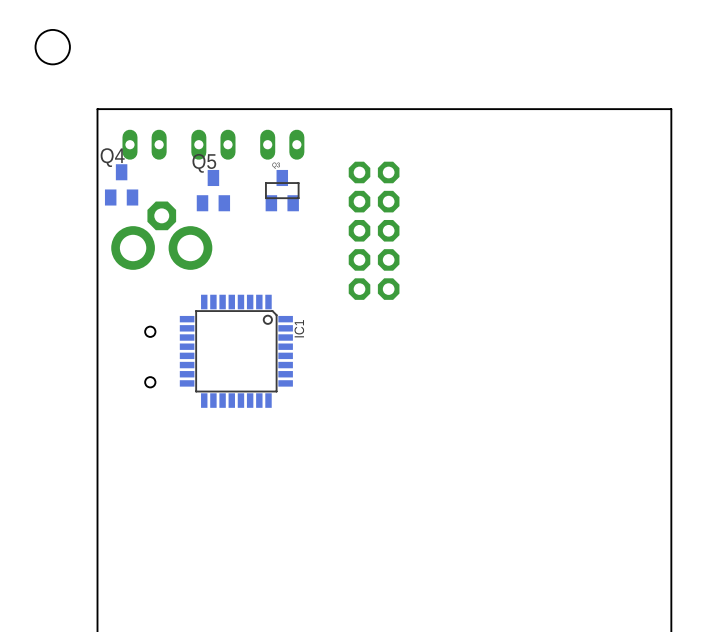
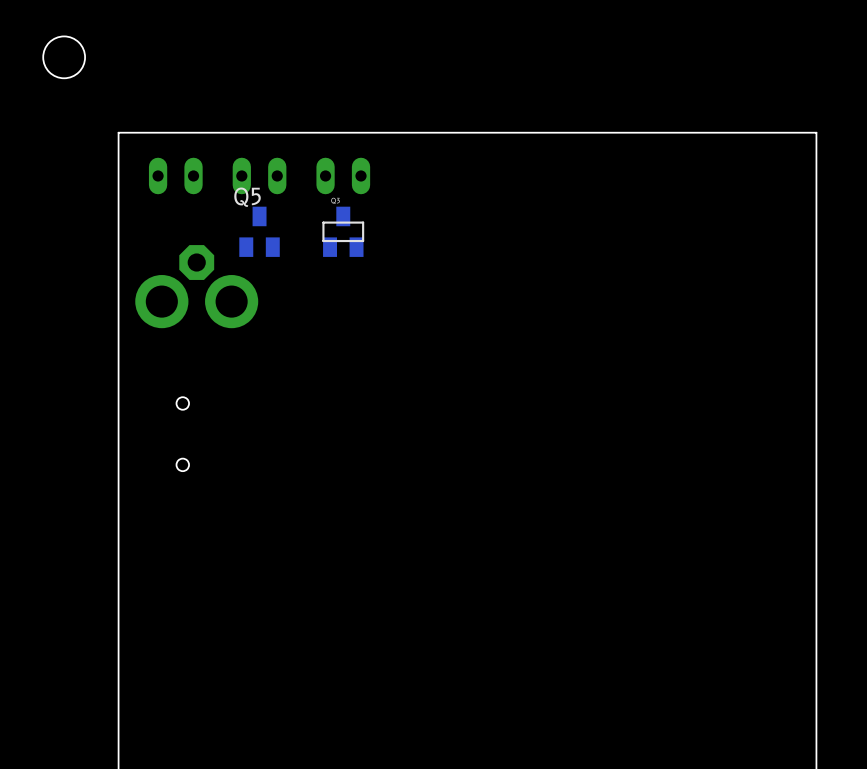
Q4: (121, 184) -> none
part: (374, 230) -> none
IC1: (236, 351) -> none

